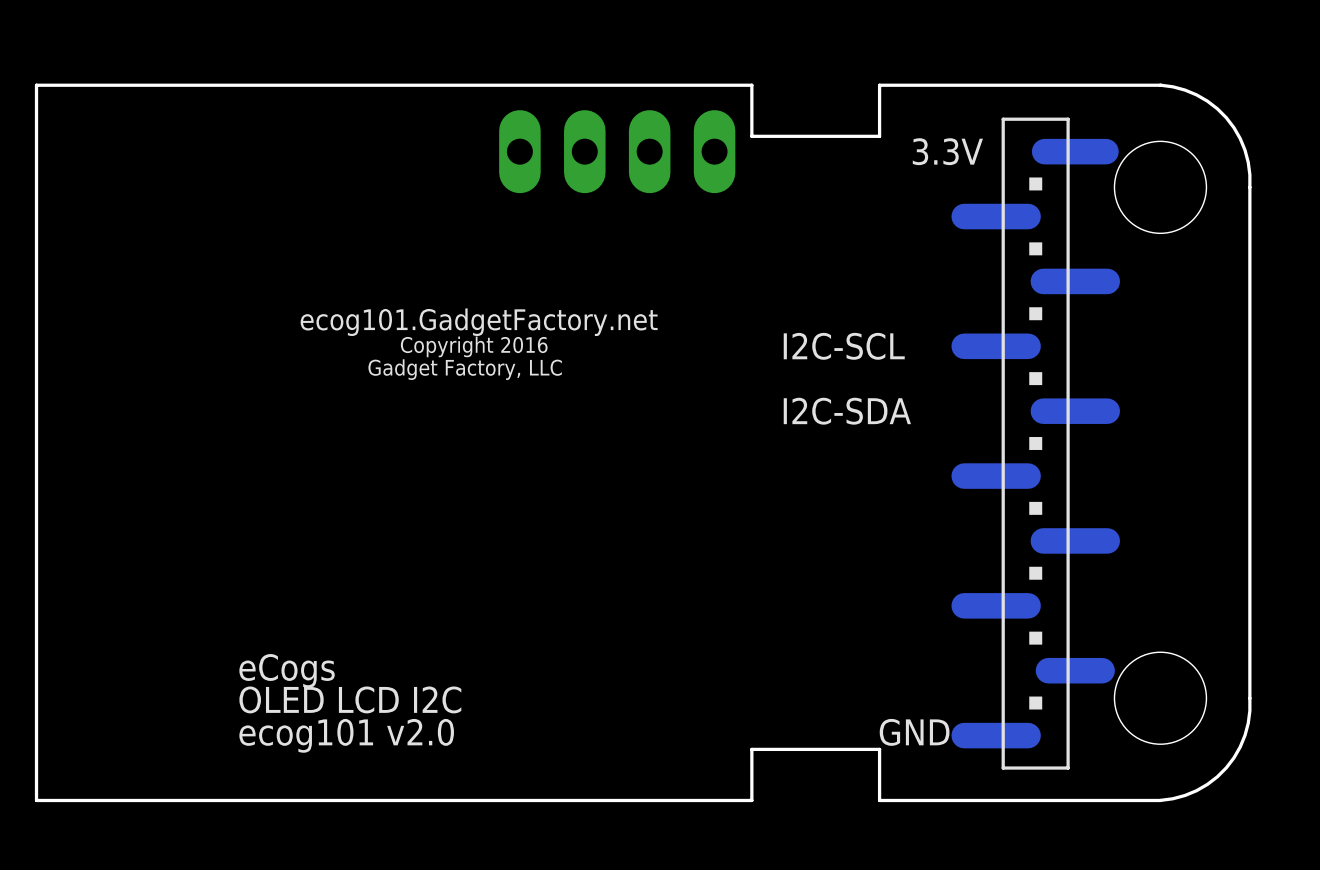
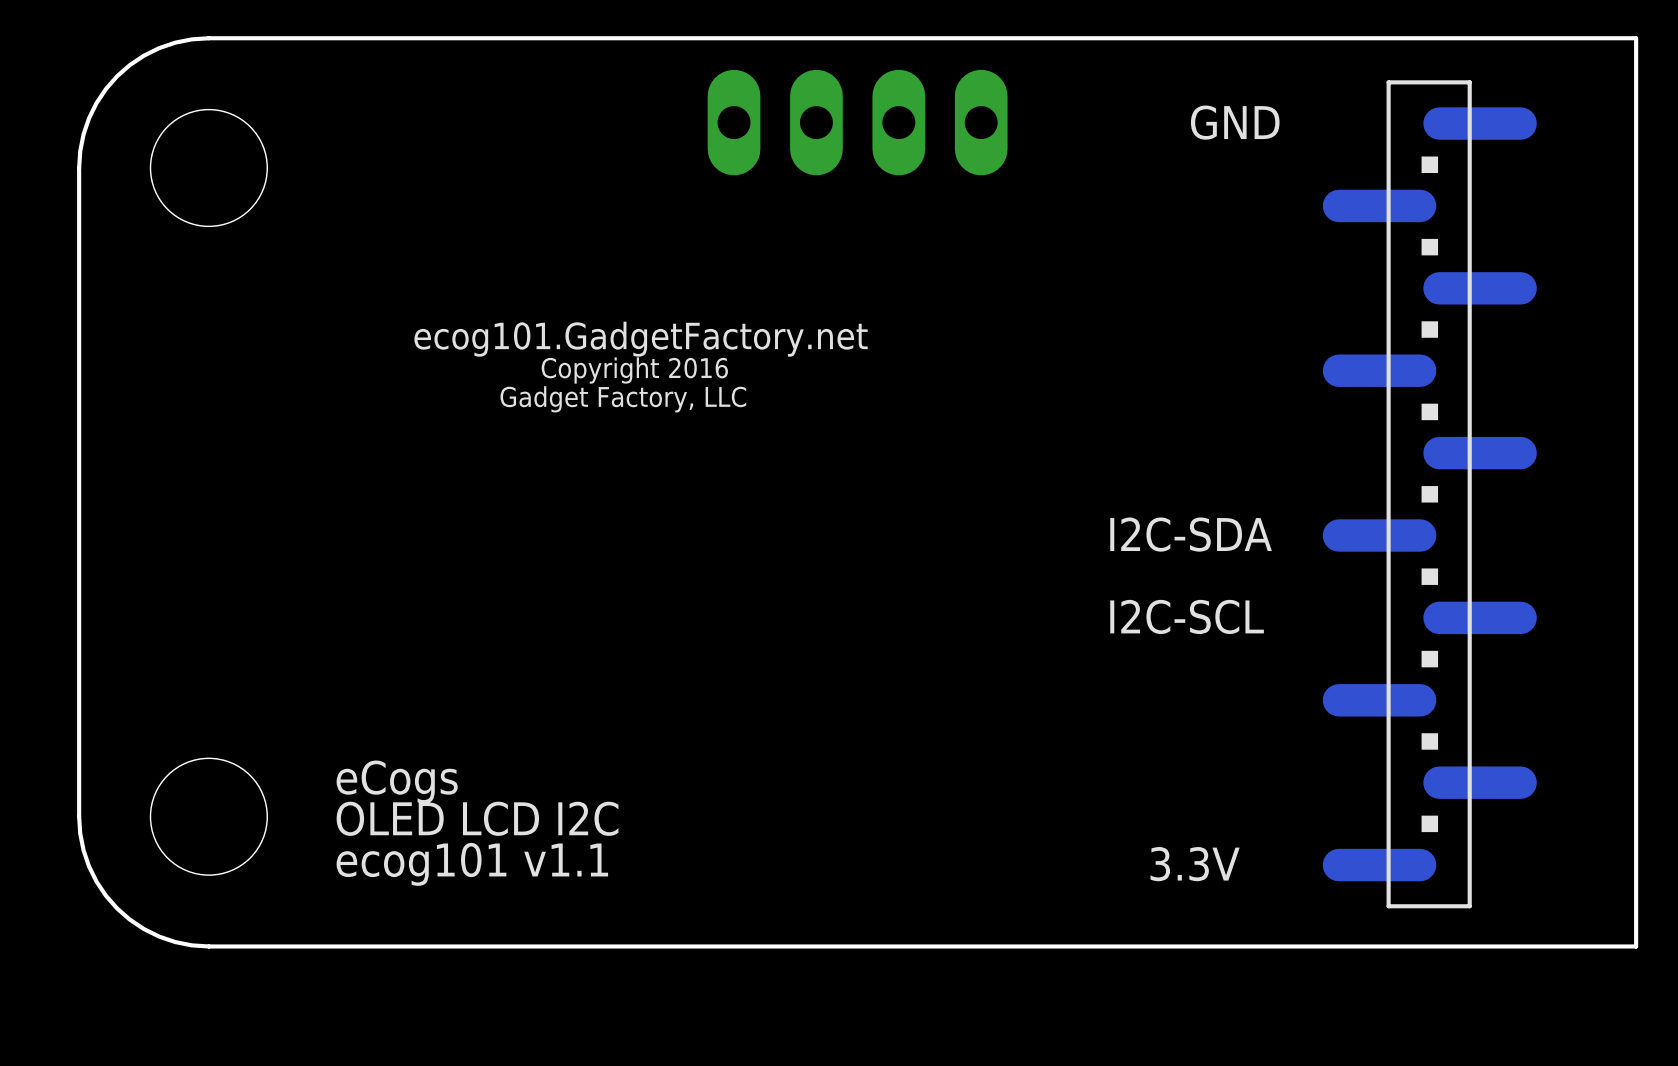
part footprint: [34, 83, 1252, 803] -> [77, 36, 1639, 949]
part position: (617, 151) -> (857, 122)
text: 3.3V (947, 151) -> GND (1235, 122)
text position: I2C-SCL (844, 346) -> I2C-SCL (1187, 616)
text position: I2C-SDA (847, 411) -> I2C-SDA (1191, 534)
text: GND (914, 732) -> 3.3V (1195, 864)
text: ecog101 v2.0 (346, 735) -> ecog101 v1.1 (472, 864)

